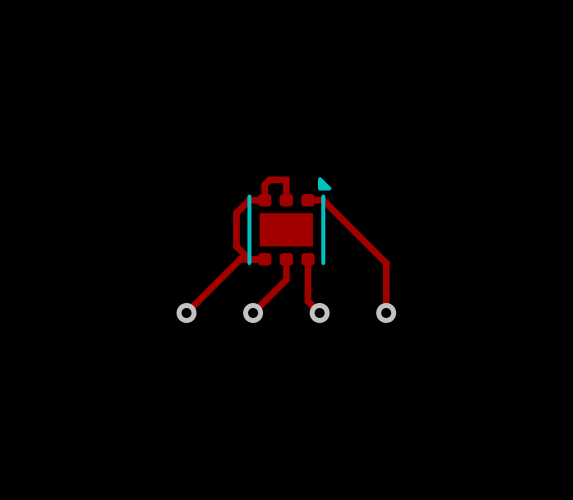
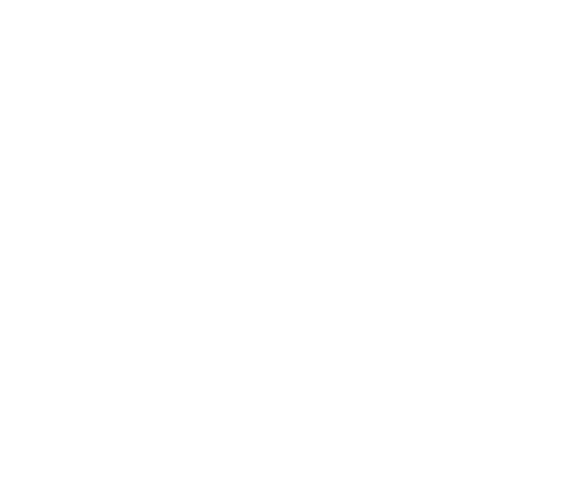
track: (286, 200) (286, 179) (269, 179) (264, 184) (264, 200) (249, 200) (236, 213) (236, 246) (249, 259) -> none
track: (307, 200) (323, 200) (386, 263) (386, 312) -> none
part: (289, 221) -> none
track: (264, 259) (240, 259) (186, 312) -> none
track: (286, 259) (286, 279) (253, 312) -> none
track: (307, 259) (307, 301) (319, 312) -> none
via: (186, 312) -> none
via: (253, 312) -> none
via: (319, 312) -> none
via: (386, 312) -> none

